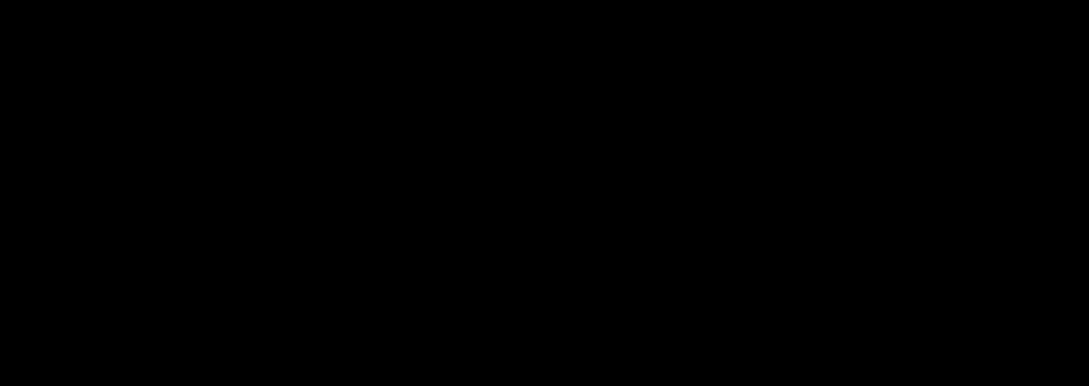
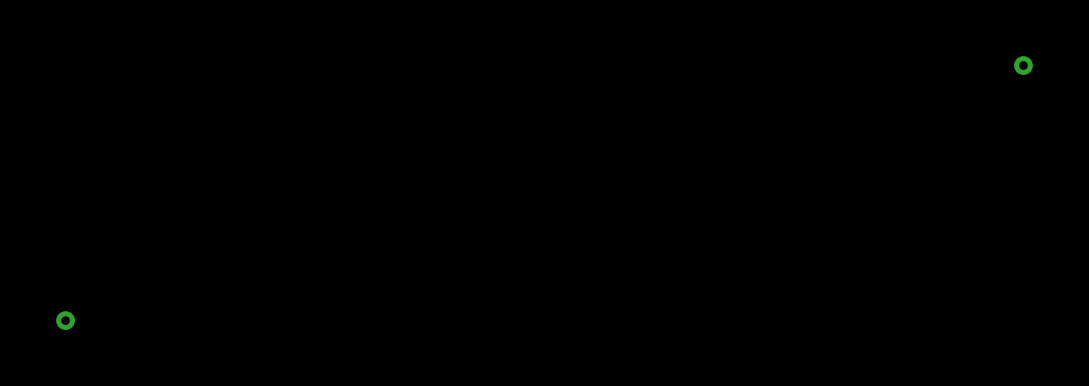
via: none -> (1023, 65)
via: none -> (65, 320)

